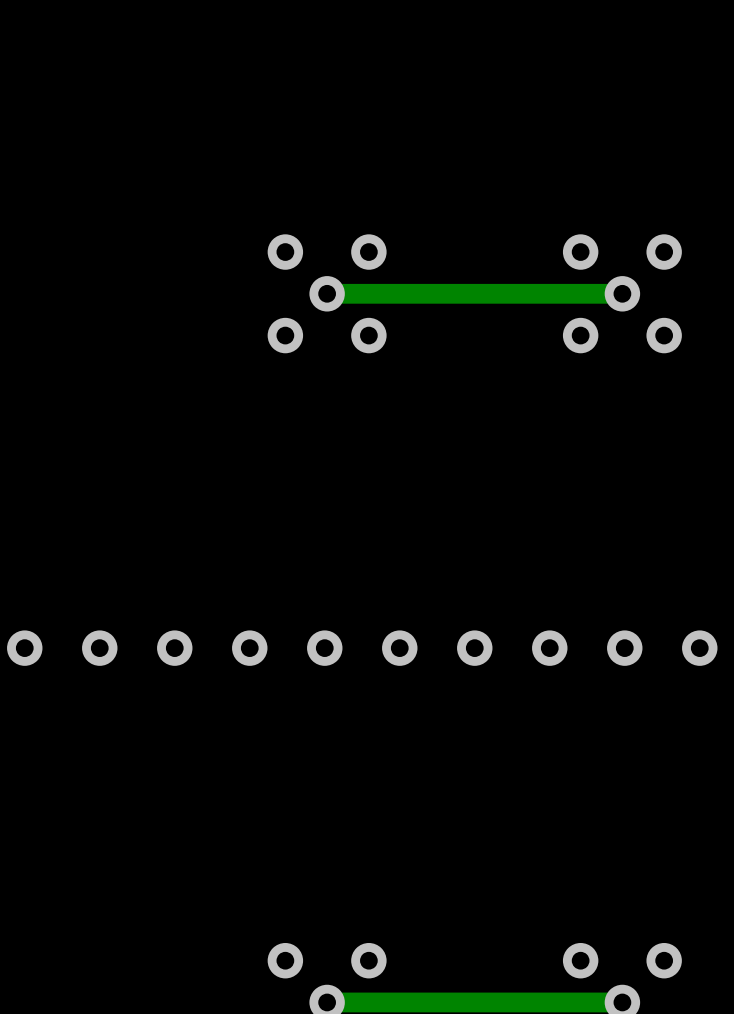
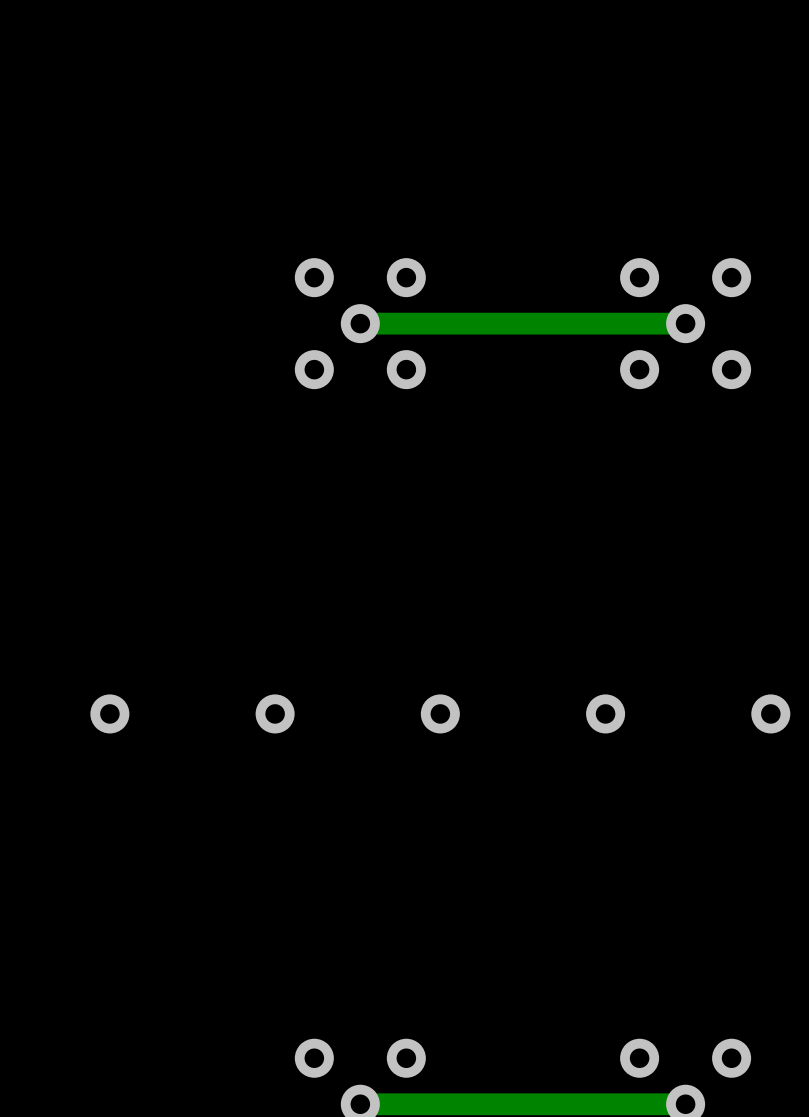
via: (24, 648) -> none
via: (174, 648) -> none
via: (324, 648) -> none
via: (474, 648) -> none
via: (624, 648) -> none

